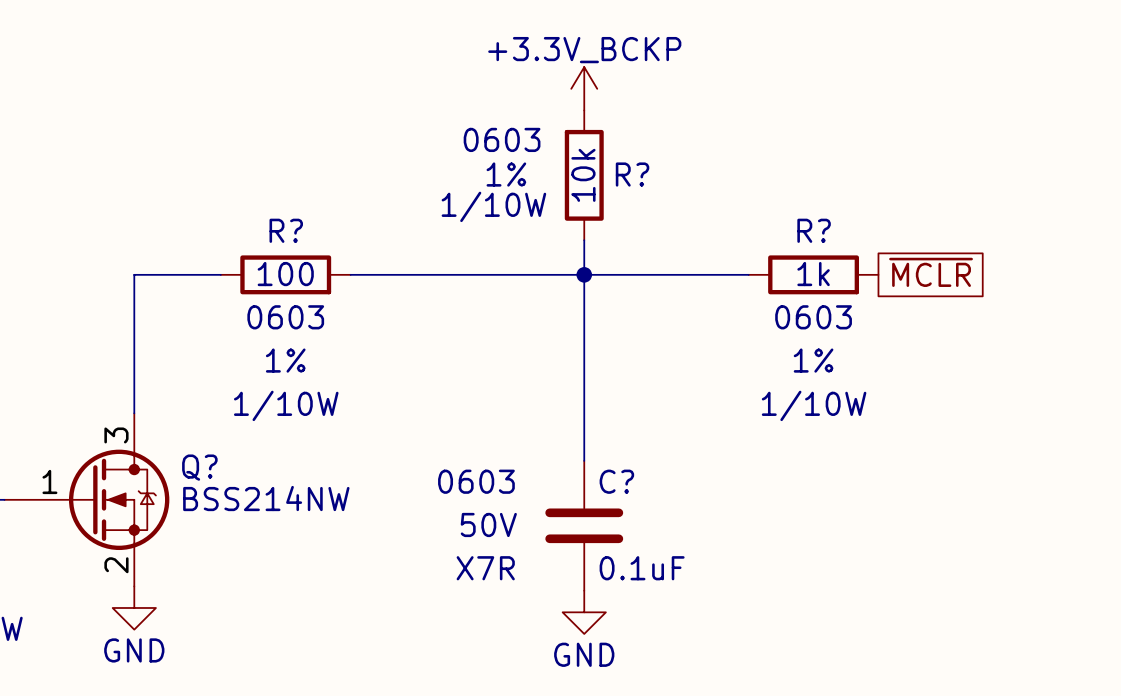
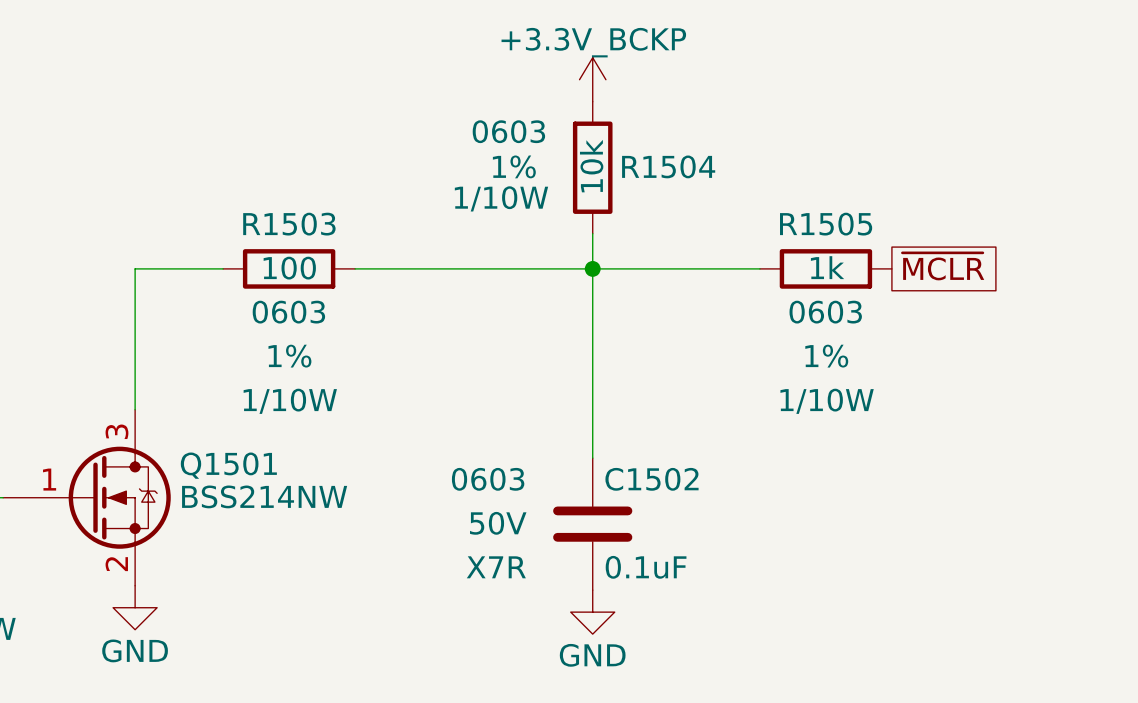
R? name: R? (632, 174) -> R1504 (668, 166)
R? name: R? (286, 230) -> R1503 (289, 224)
R? name: R? (814, 230) -> R1505 (826, 224)
Q? name: Q? (199, 467) -> Q1501 (228, 465)
C? name: C? (616, 481) -> C1502 (651, 479)

